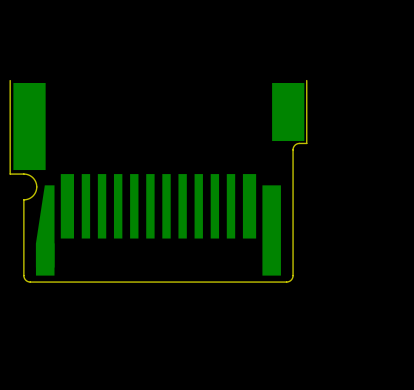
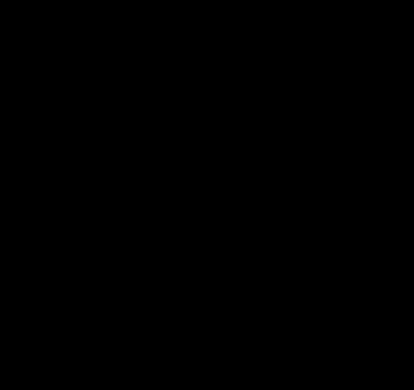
part: (158, 181) -> none

